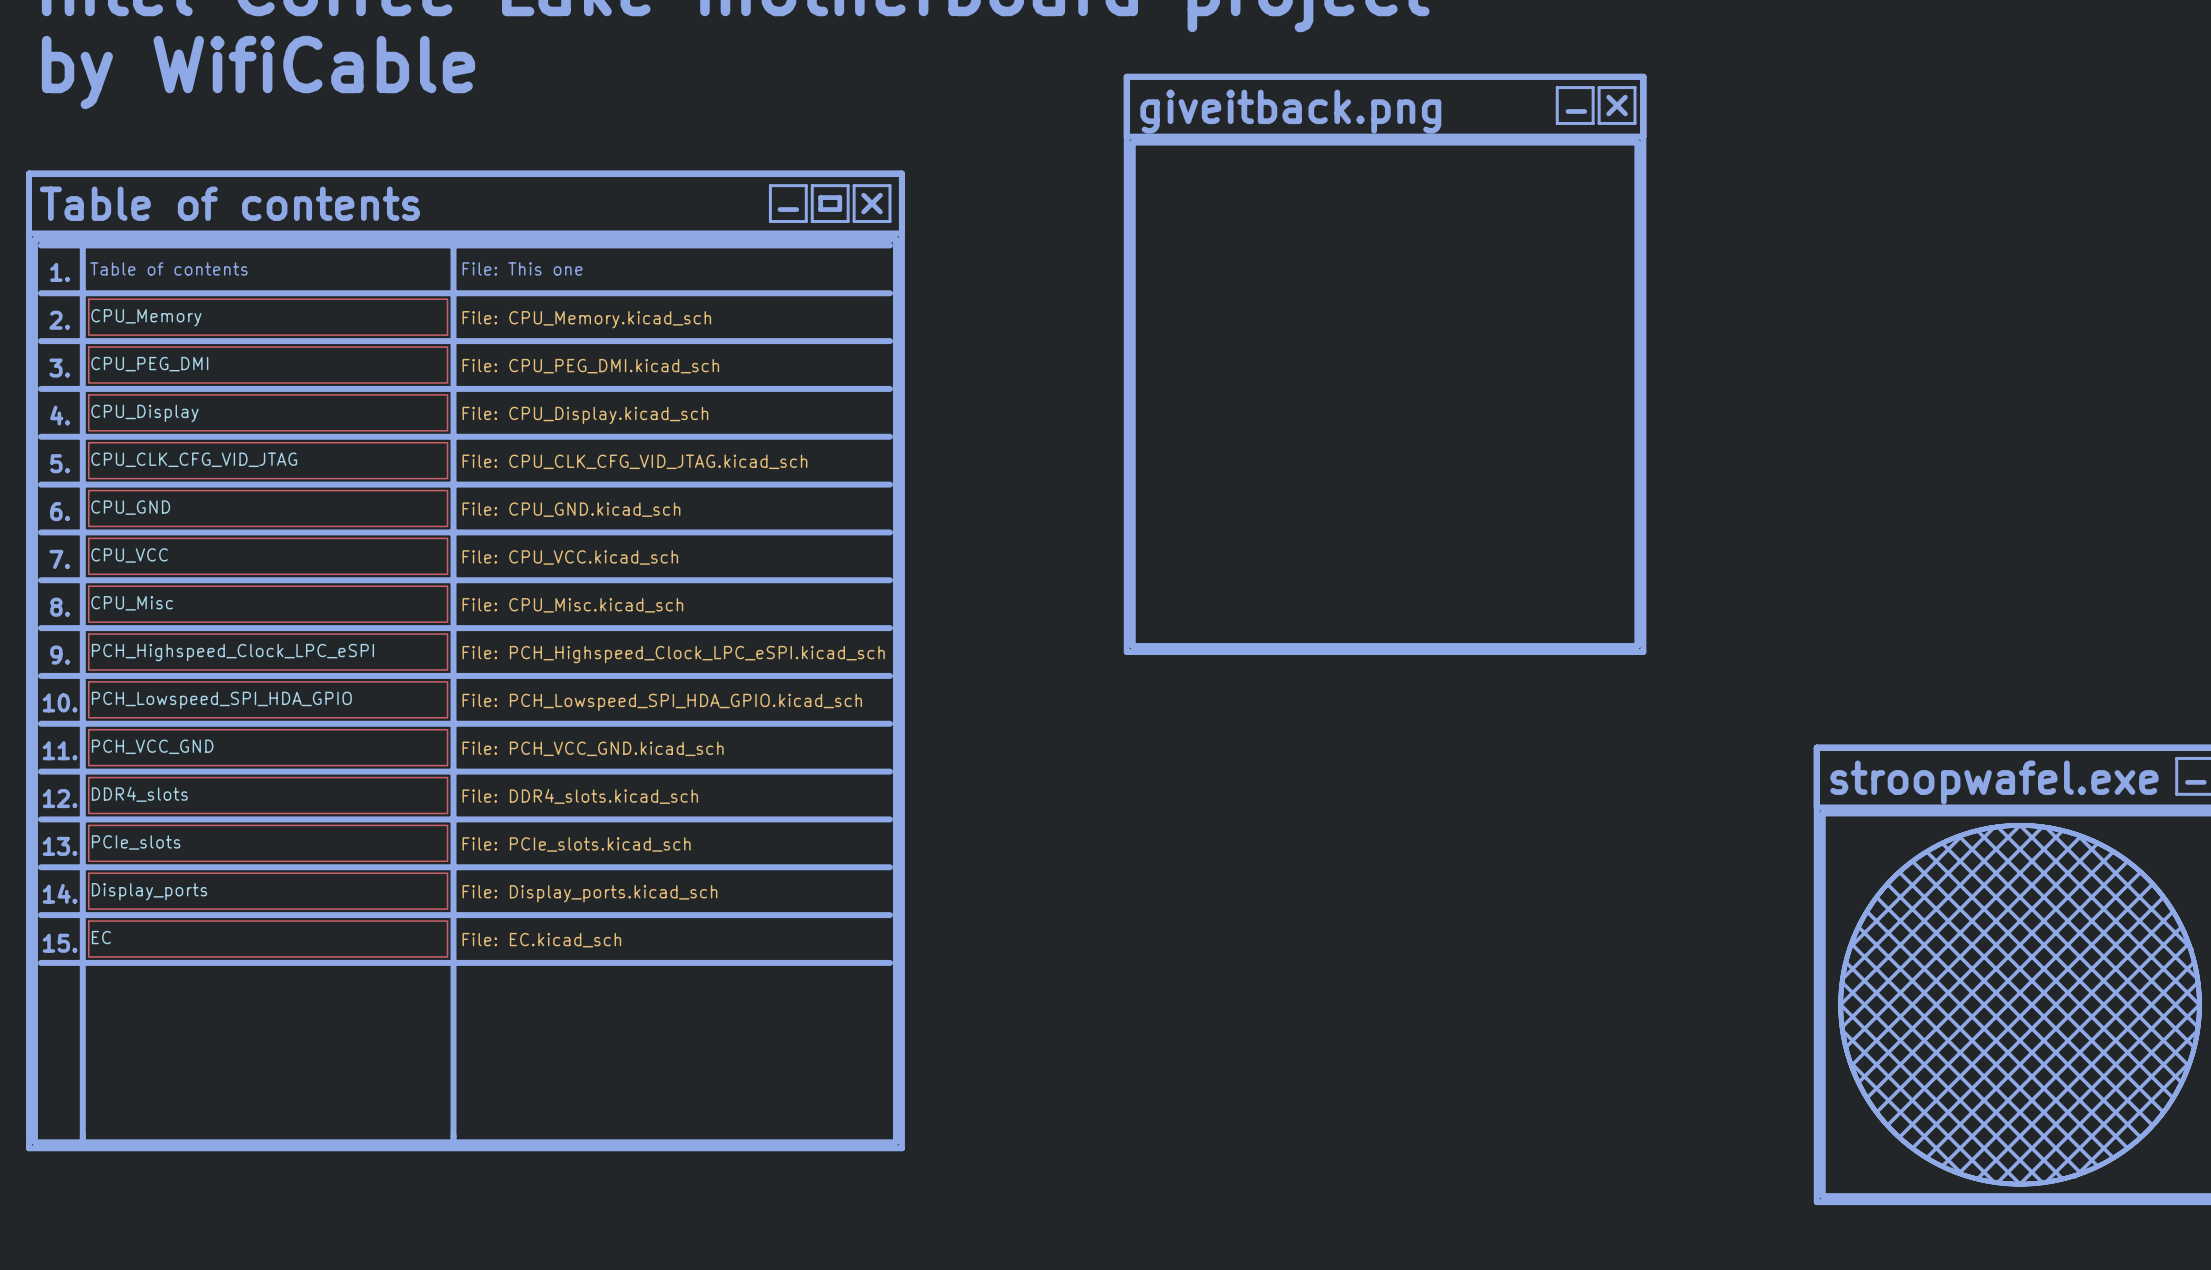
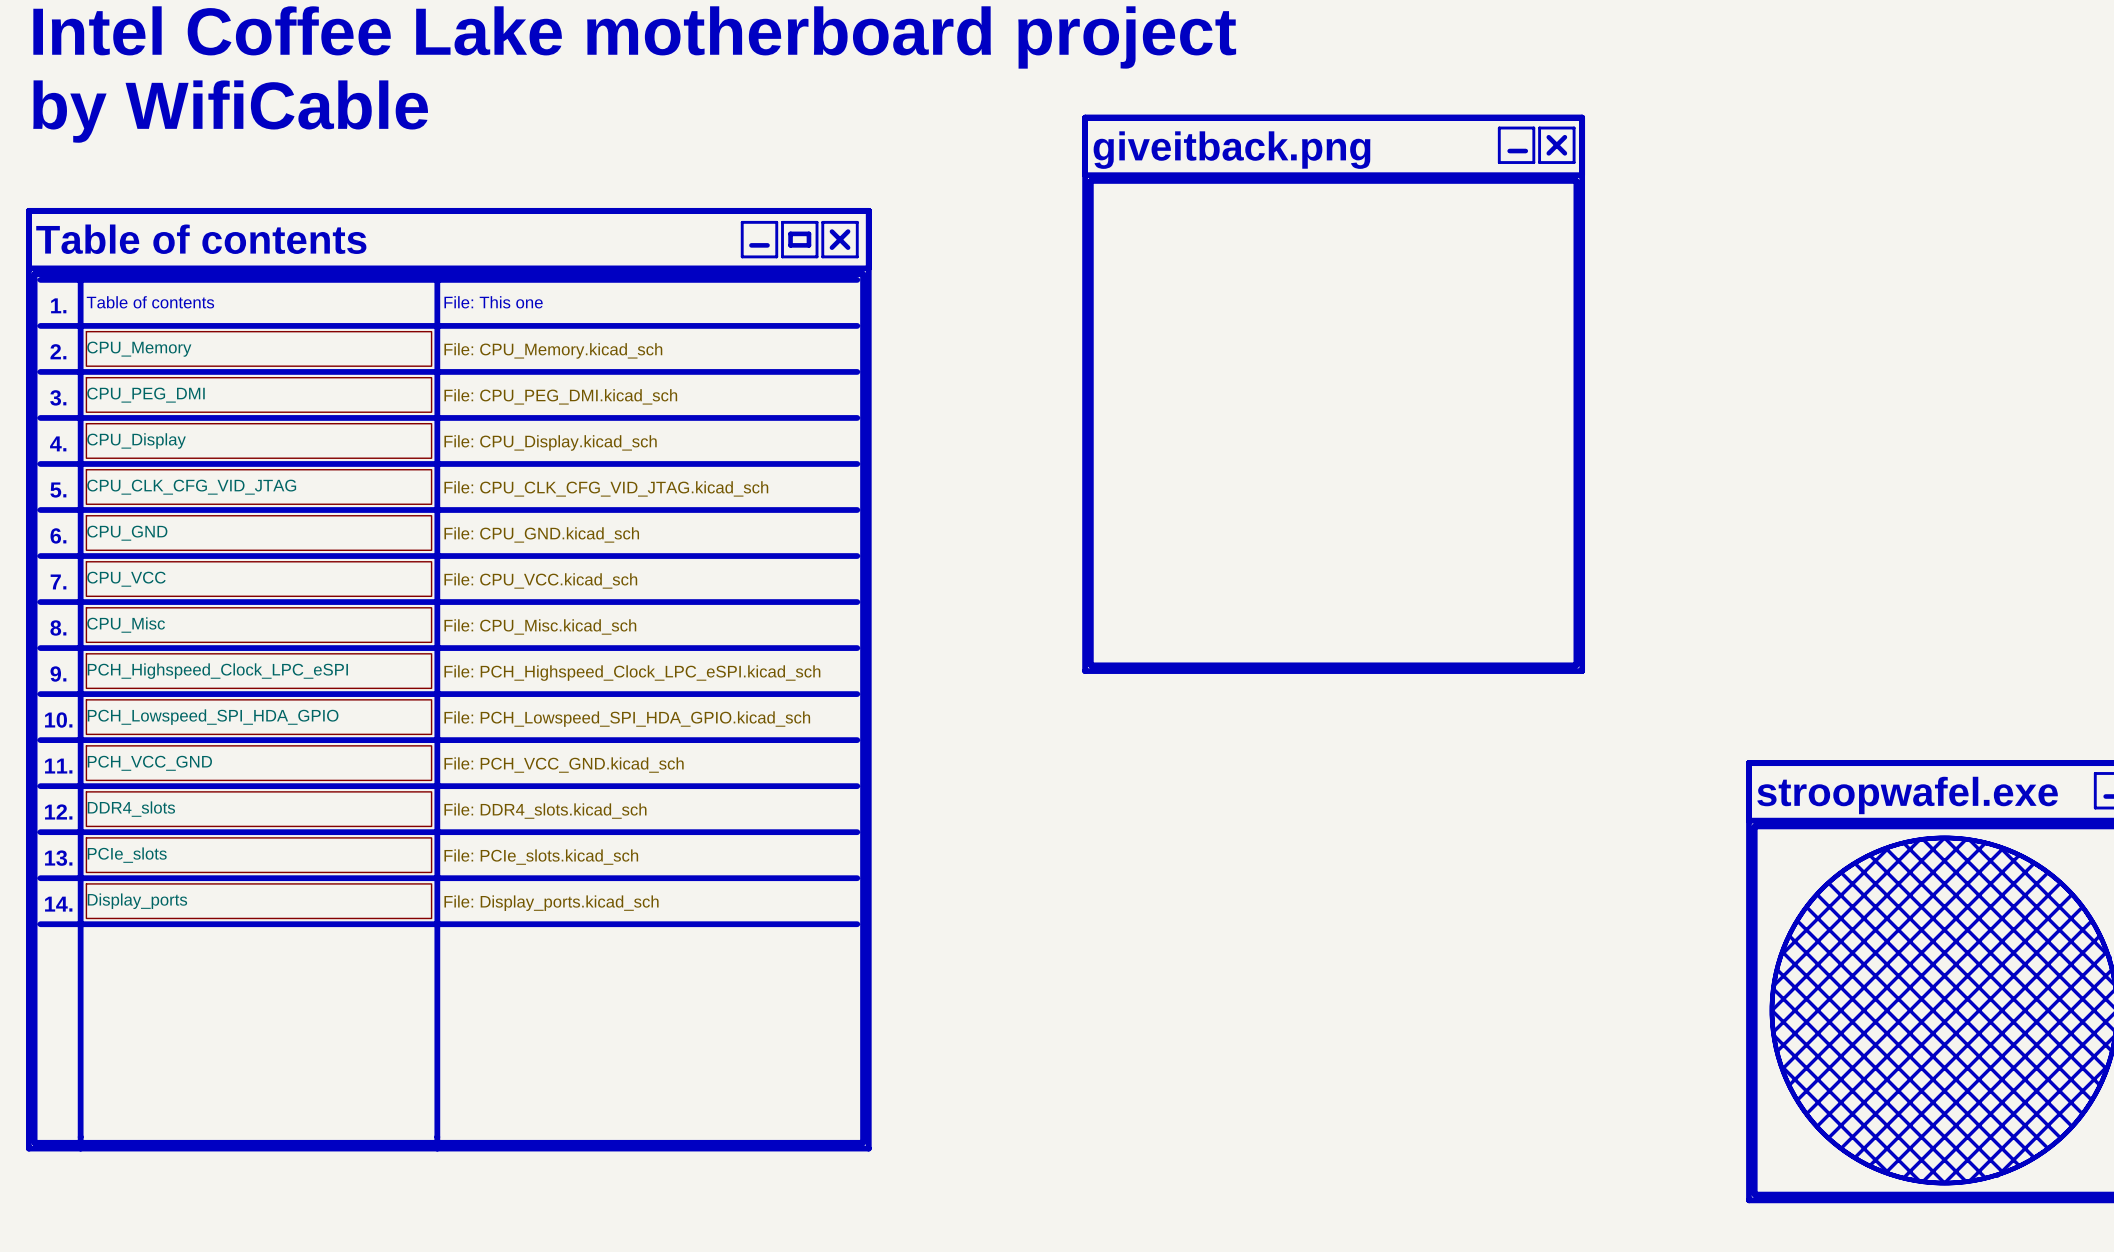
sheet EC: File: EC.kicad_sch (268, 939) -> none
text: 15. (60, 943) -> none
line: (40, 962) (889, 962) -> none

